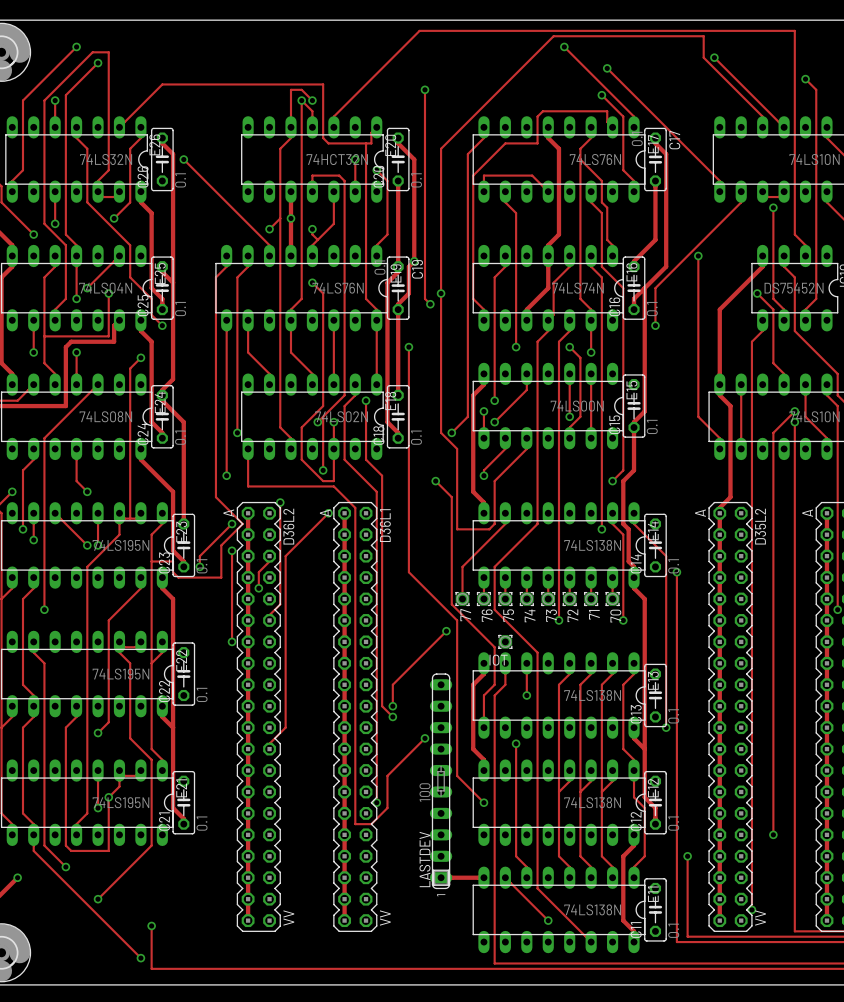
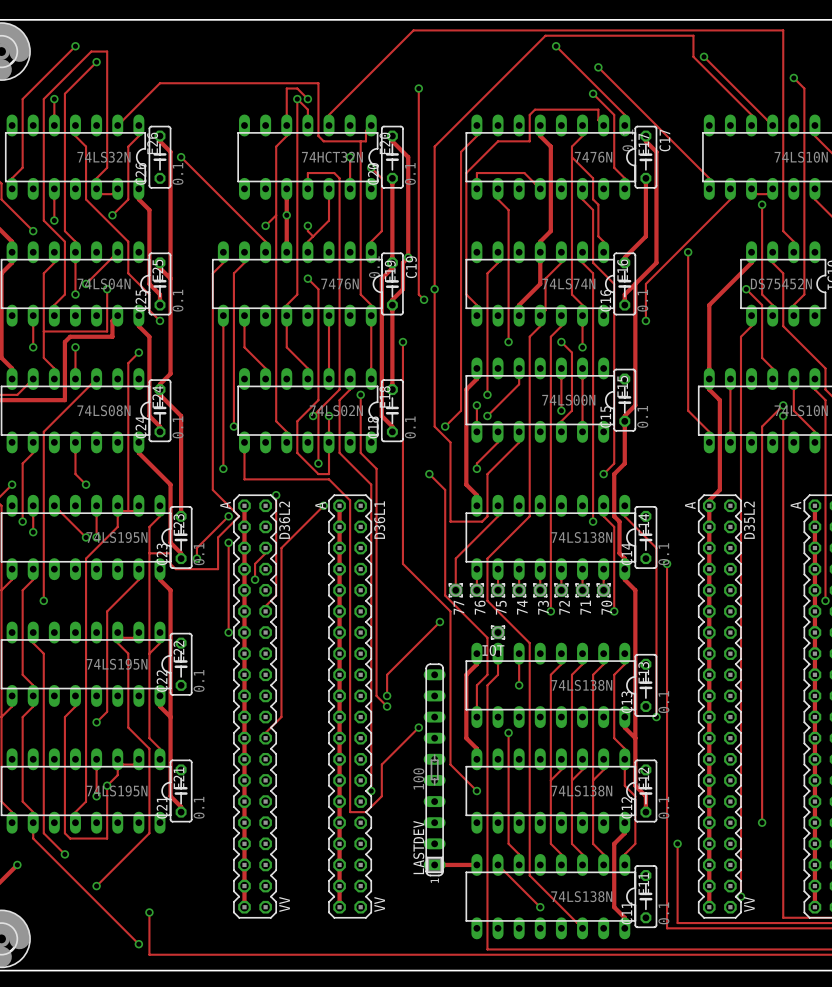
E17 value: 74LS76N (595, 159) -> 7476N (593, 157)
E19 value: 74LS76N (338, 288) -> 7476N (340, 283)

